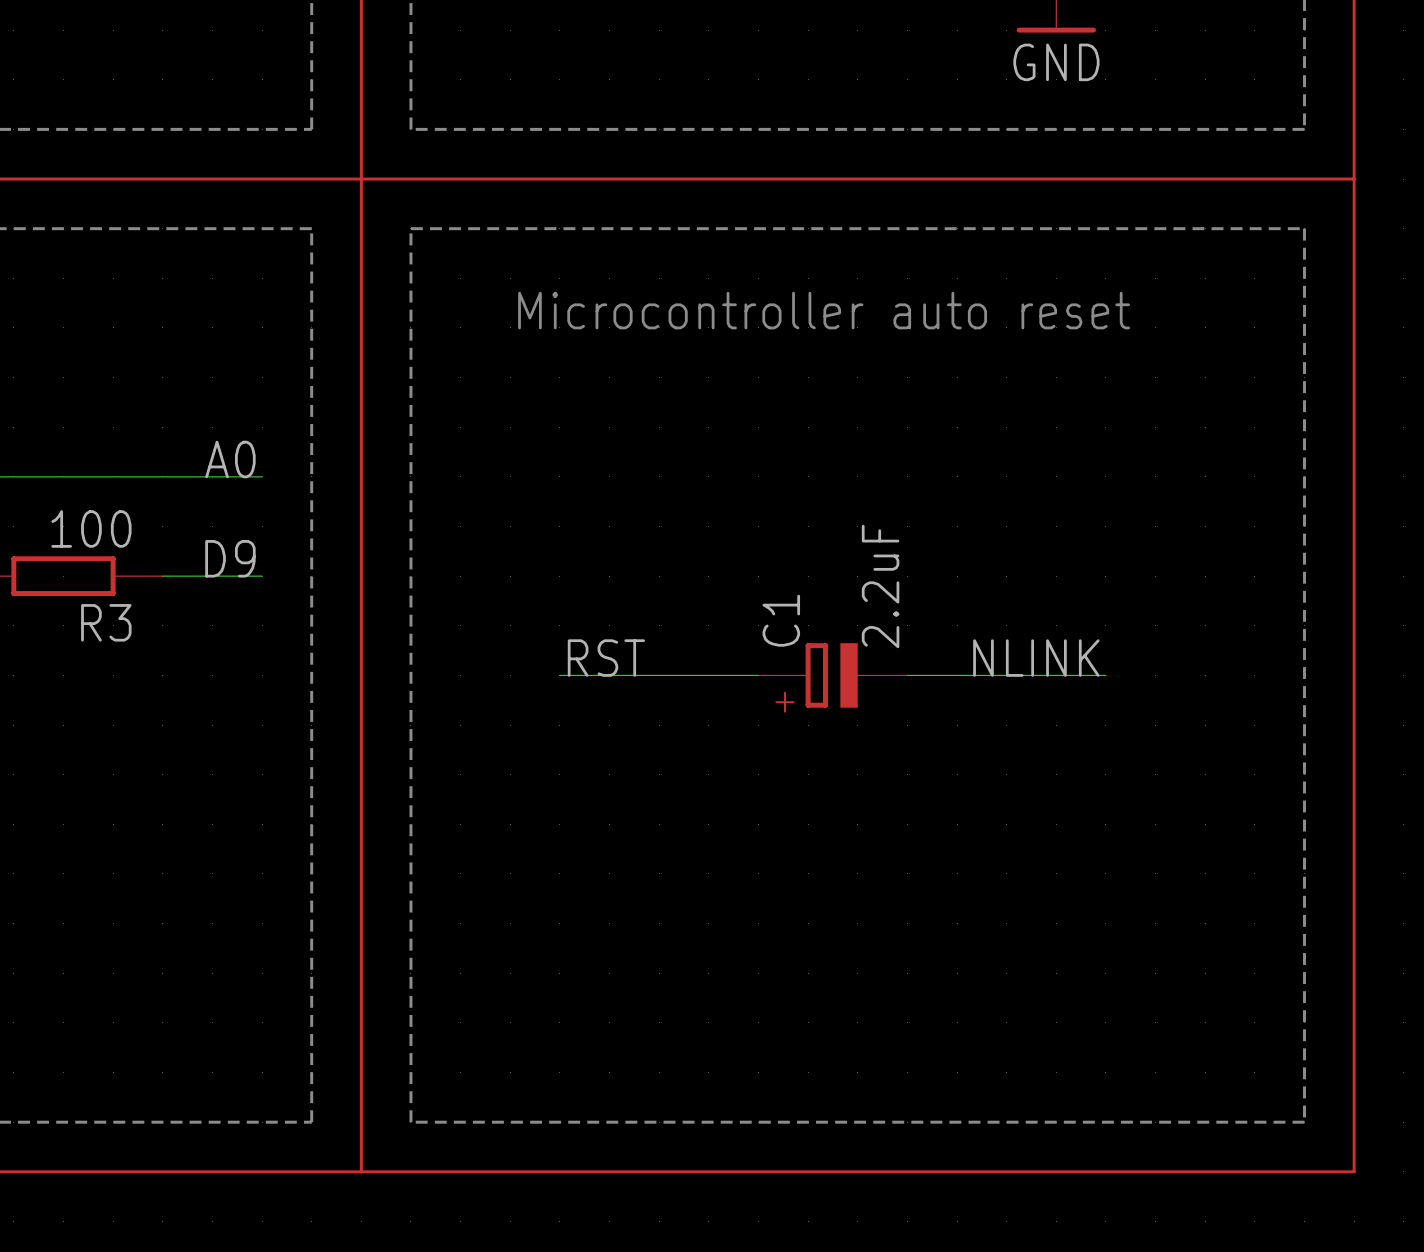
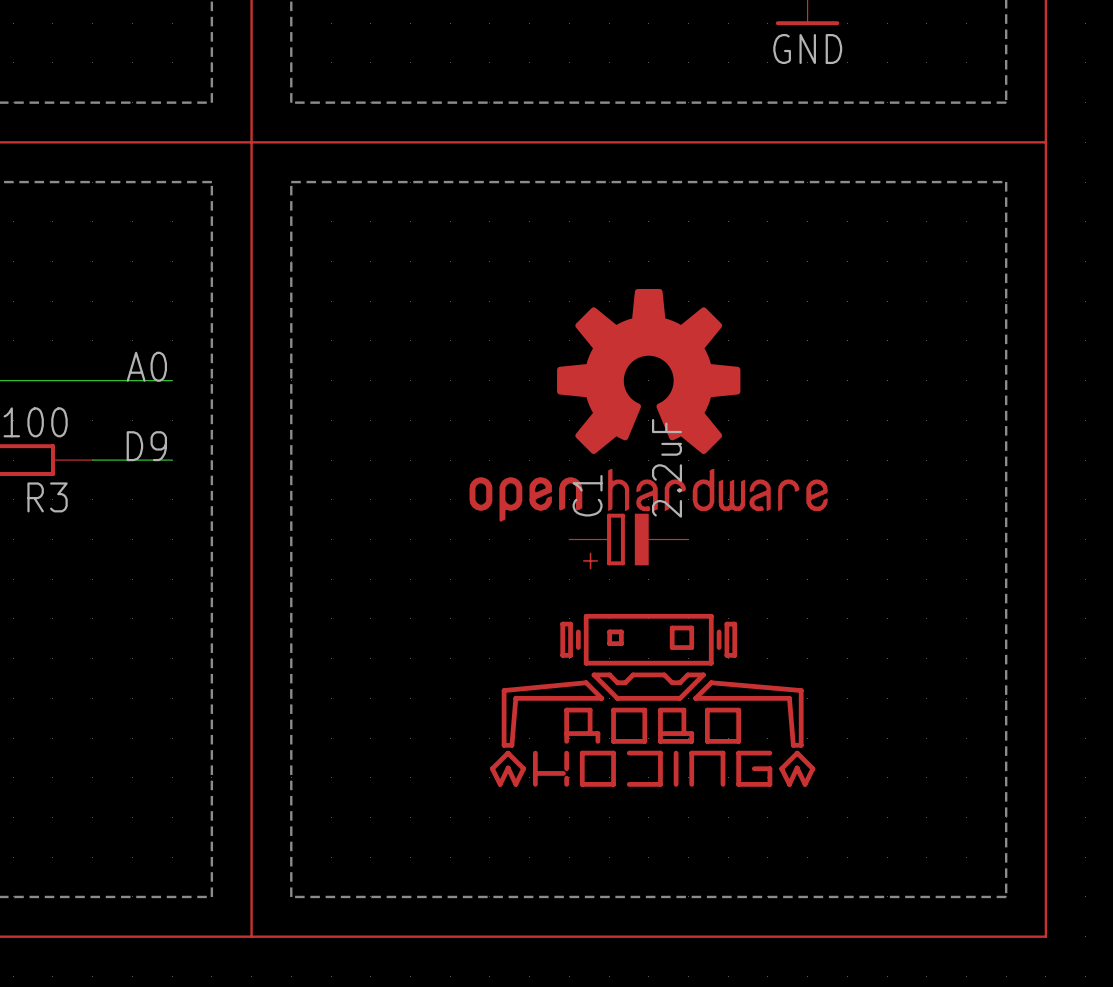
text: Microcontroller auto reset (824, 310) -> none
part: none -> (648, 405)
label: RST (606, 658) -> none
label: NLINK (1036, 658) -> none
wire: (559, 675) (758, 675) -> none
wire: (907, 675) (1105, 675) -> none
part: none -> (652, 700)

